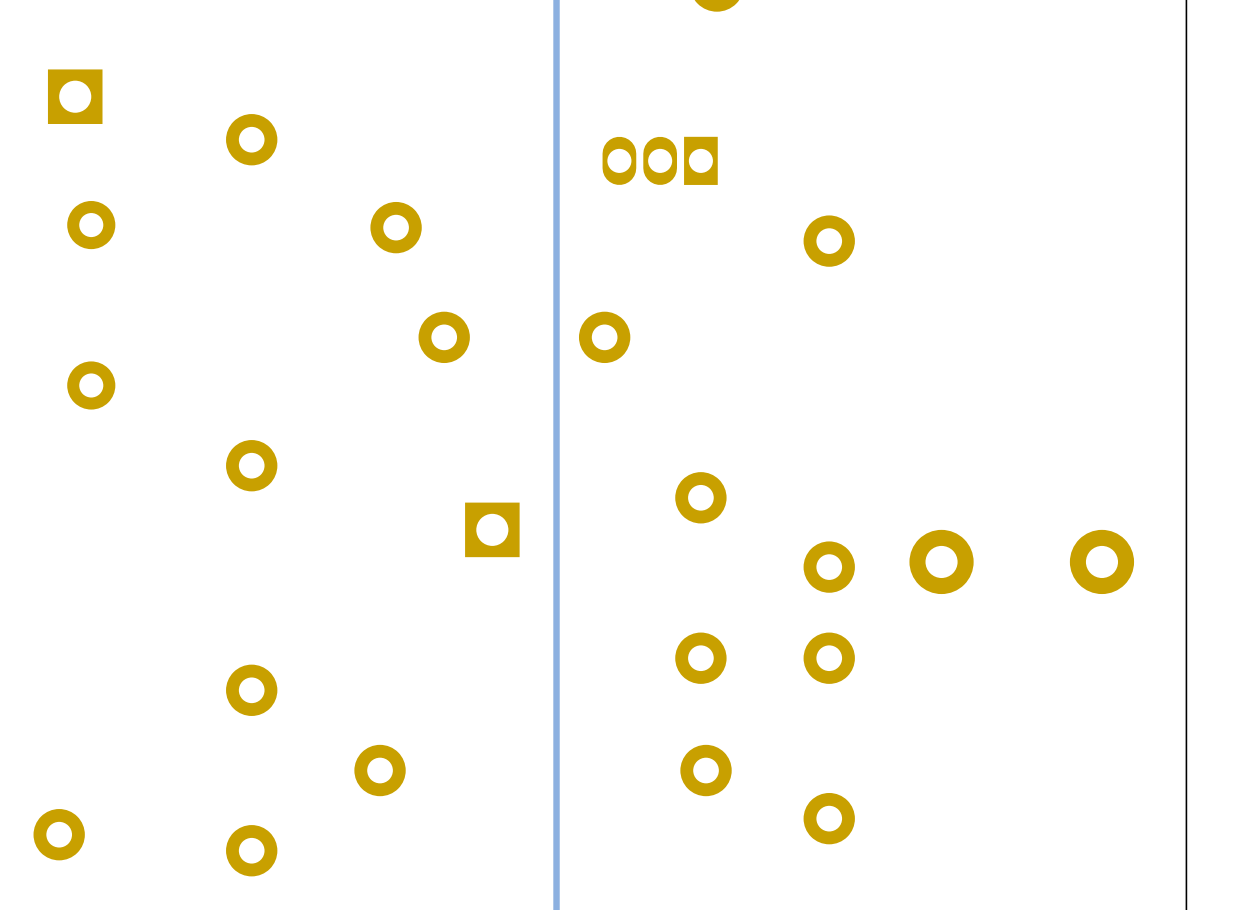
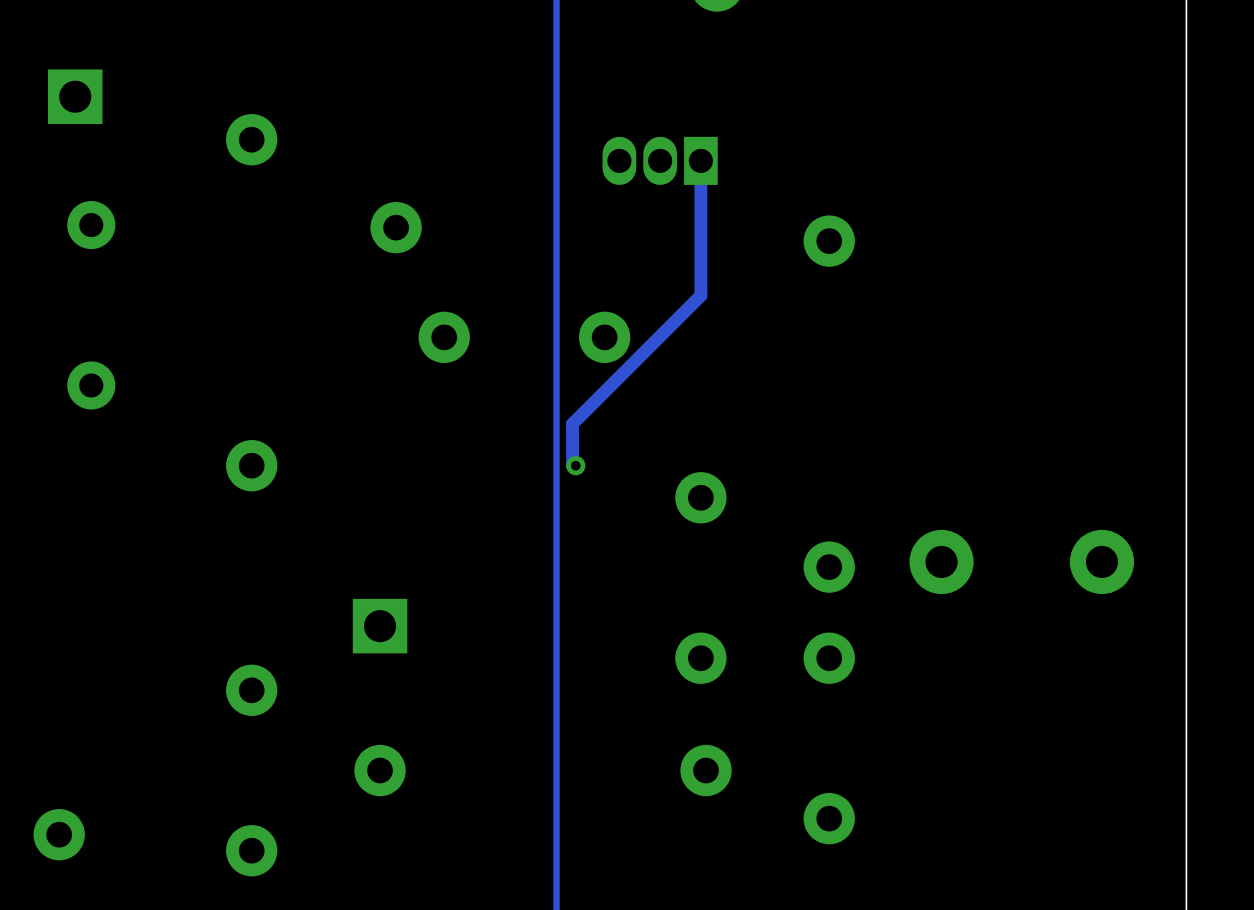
track: none -> (700, 160) (700, 295) (572, 423) (572, 465) (575, 465)
via: none -> (575, 465)
part position: (492, 529) -> (380, 626)

